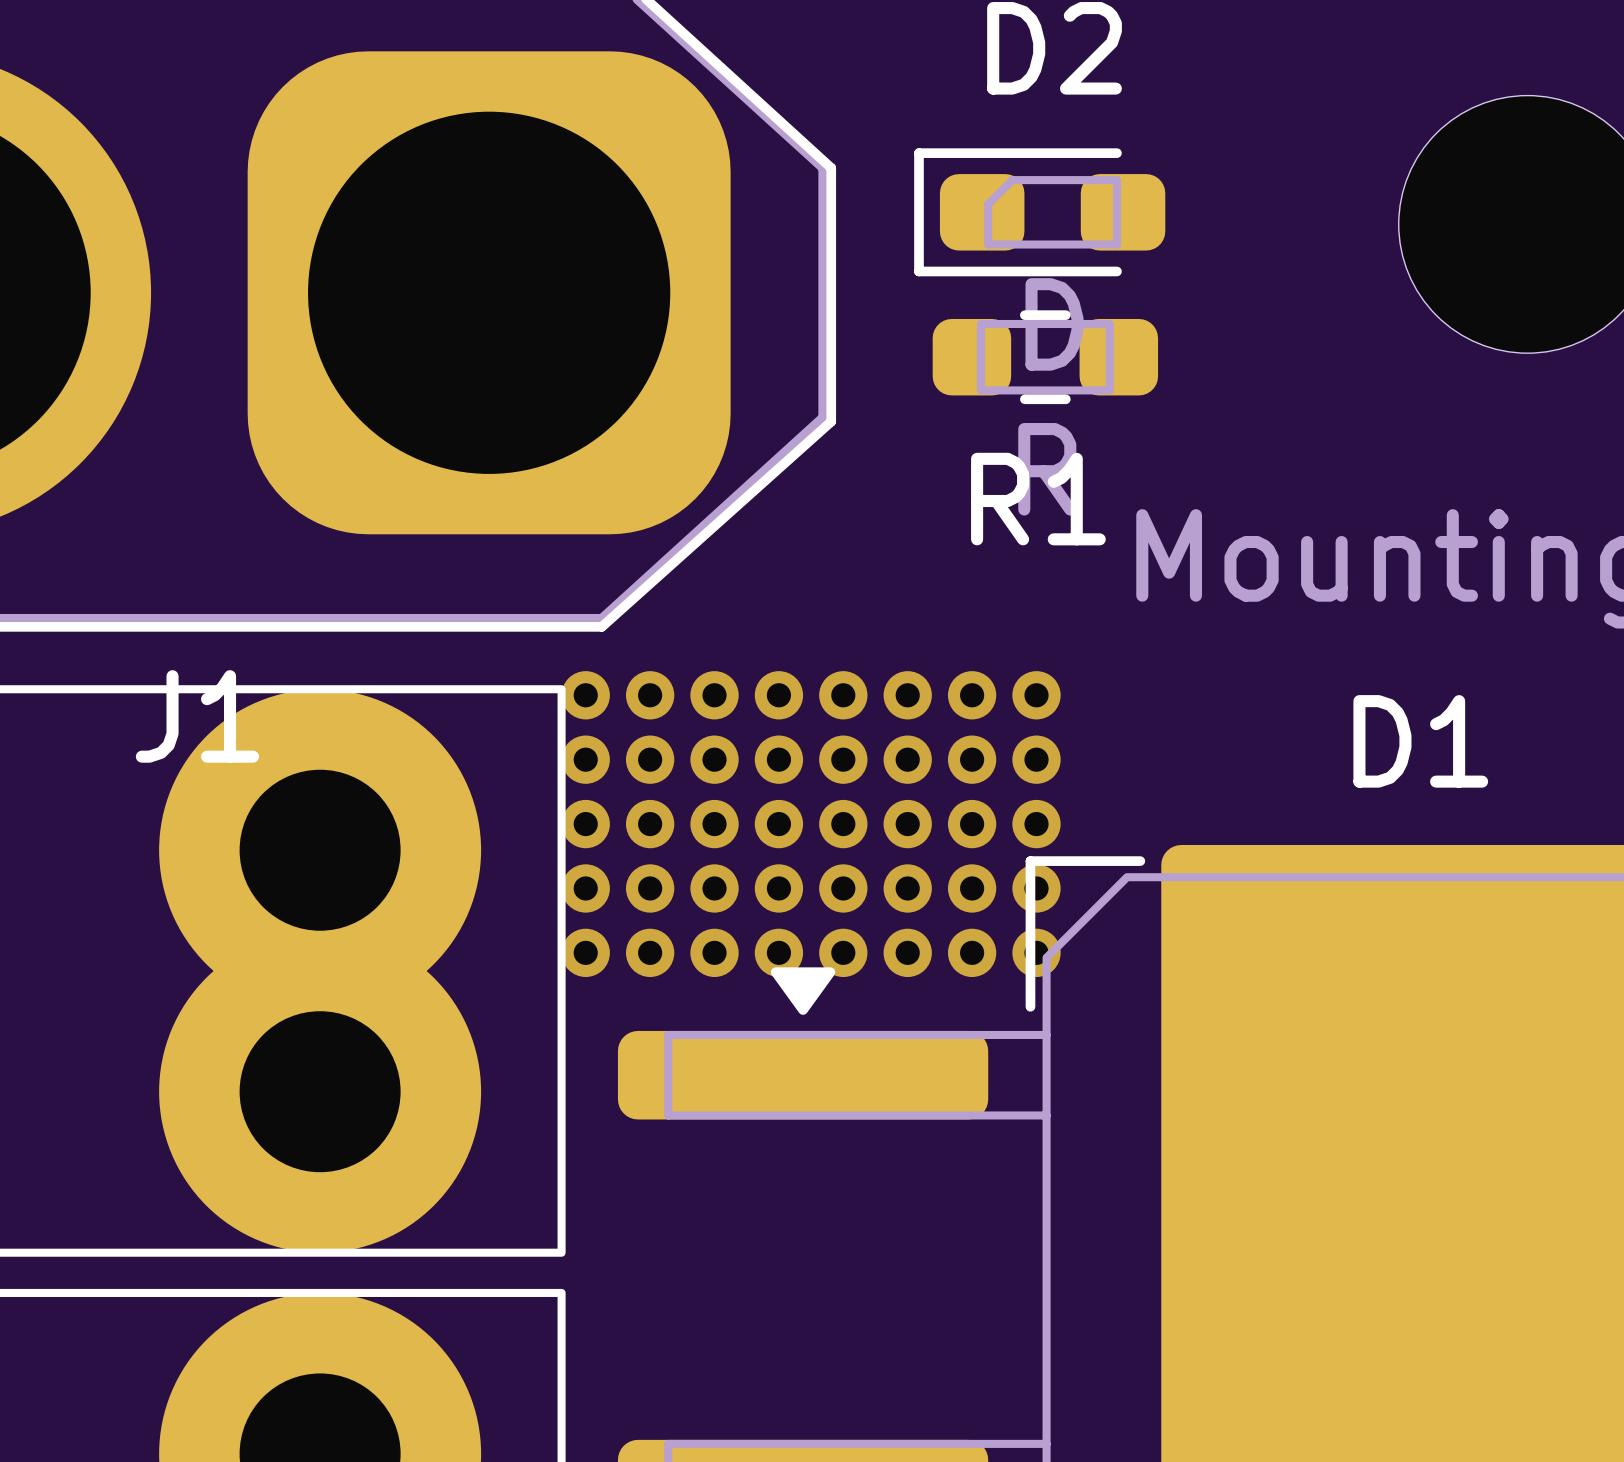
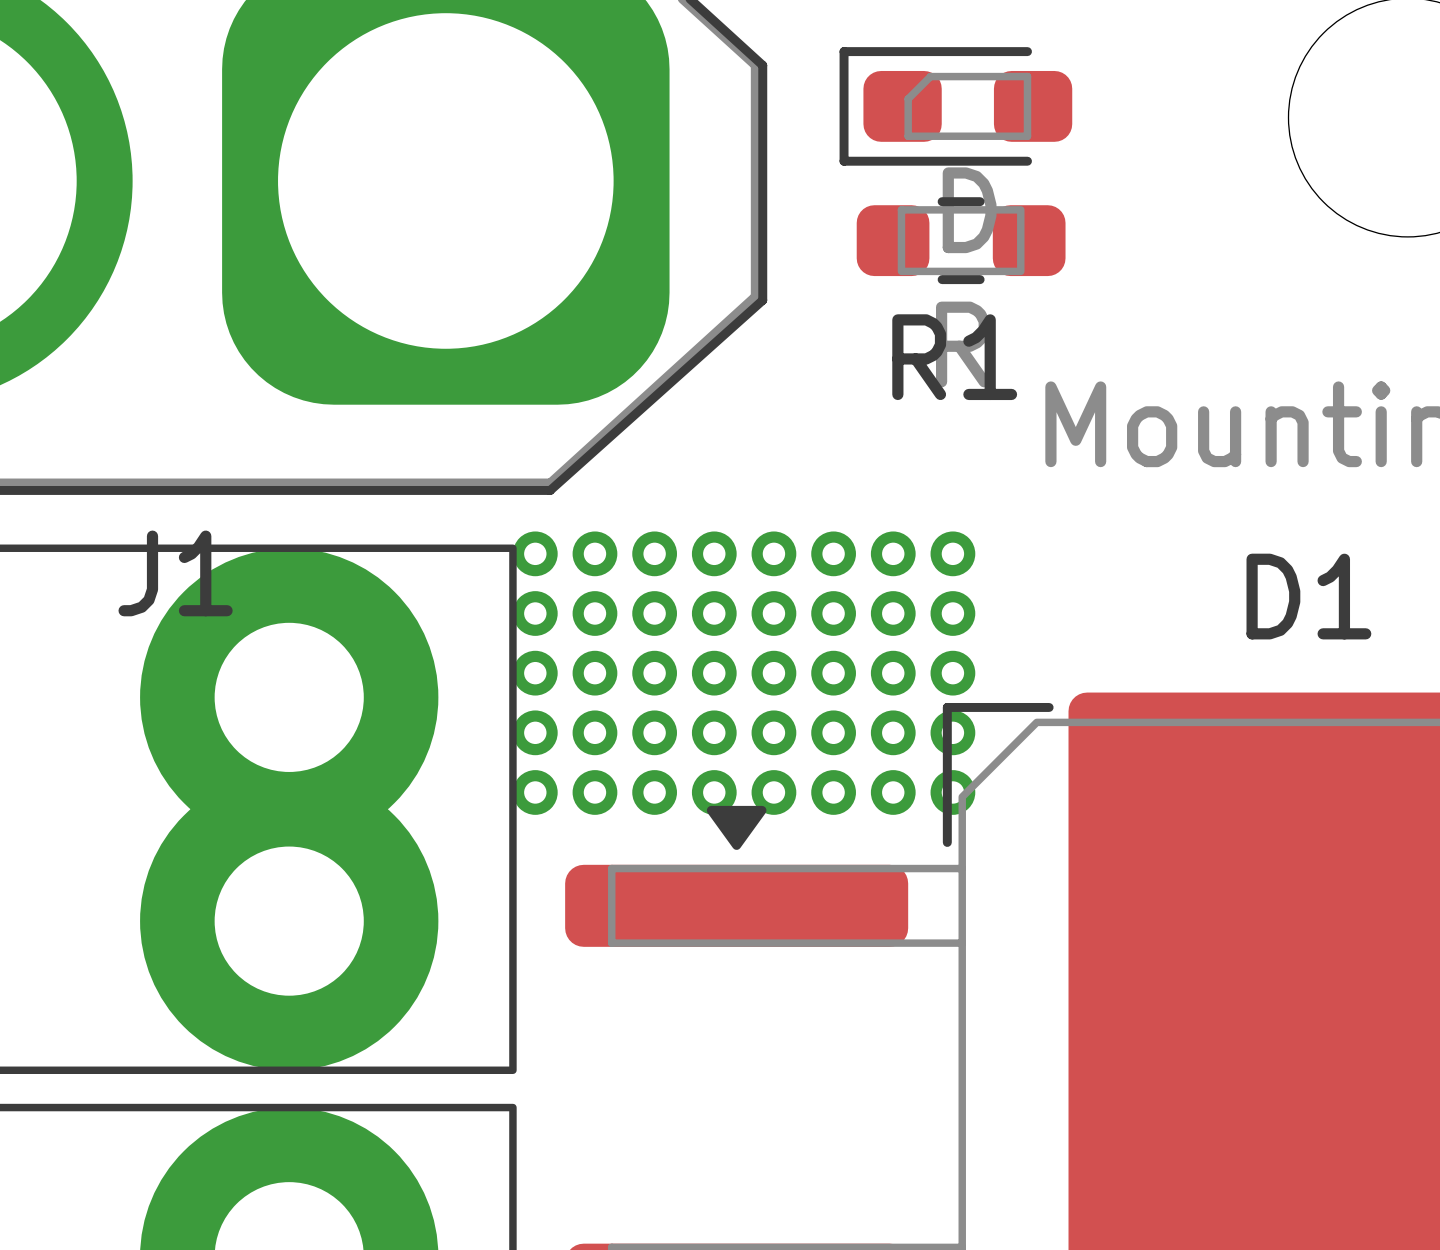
R1 name position: R1 (1038, 499) -> R1 (954, 357)

